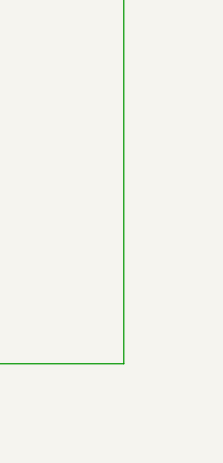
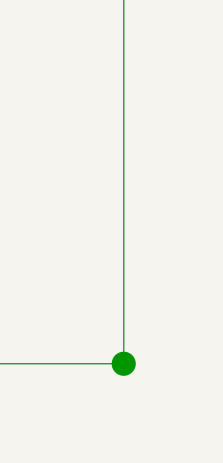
junction: none -> (123, 363)

